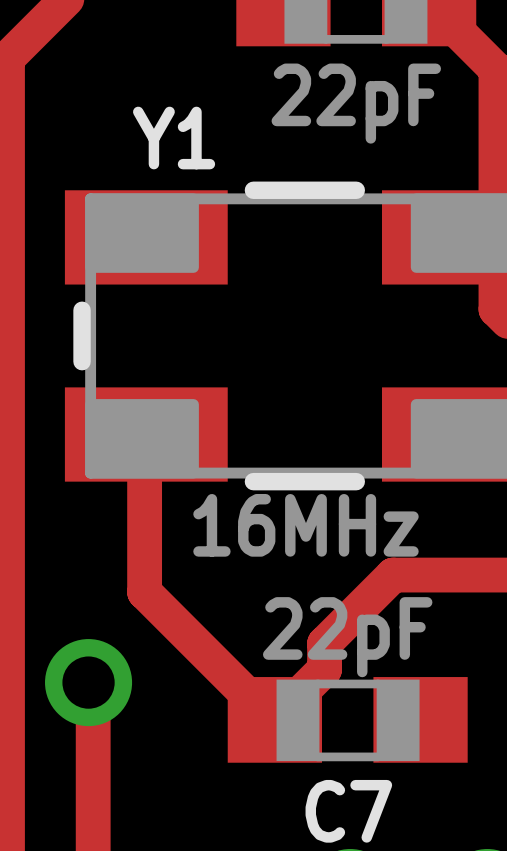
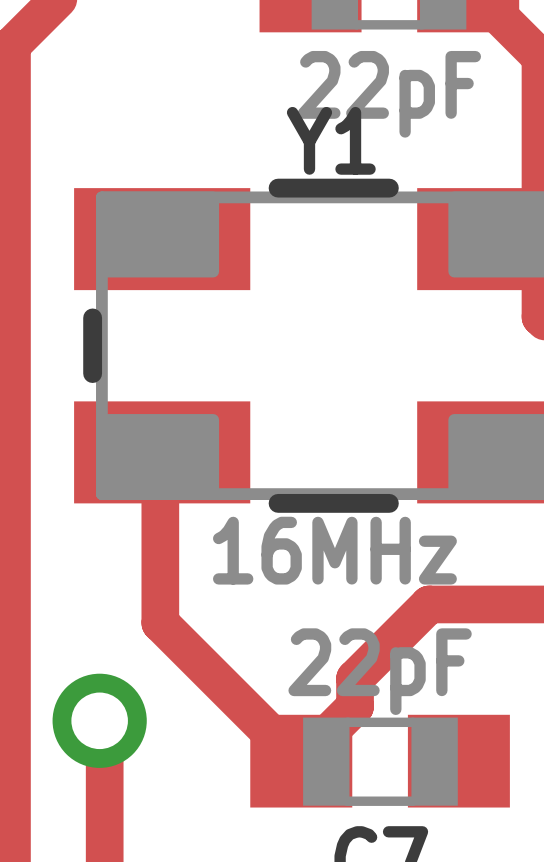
Y1 name position: Y1 (174, 138) -> Y1 (331, 140)

